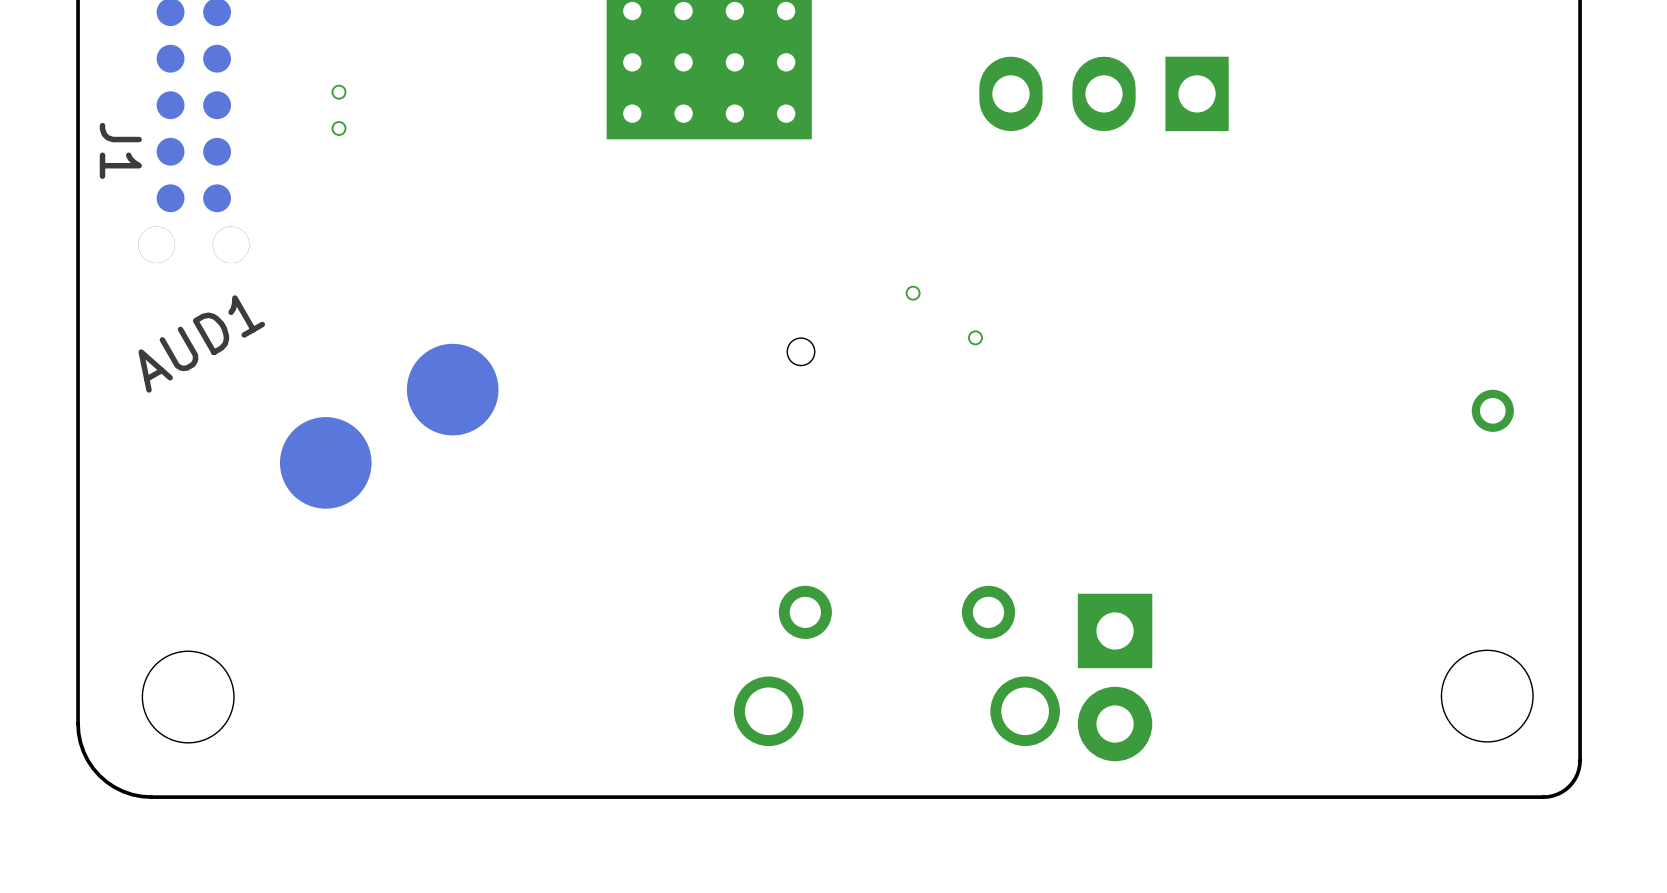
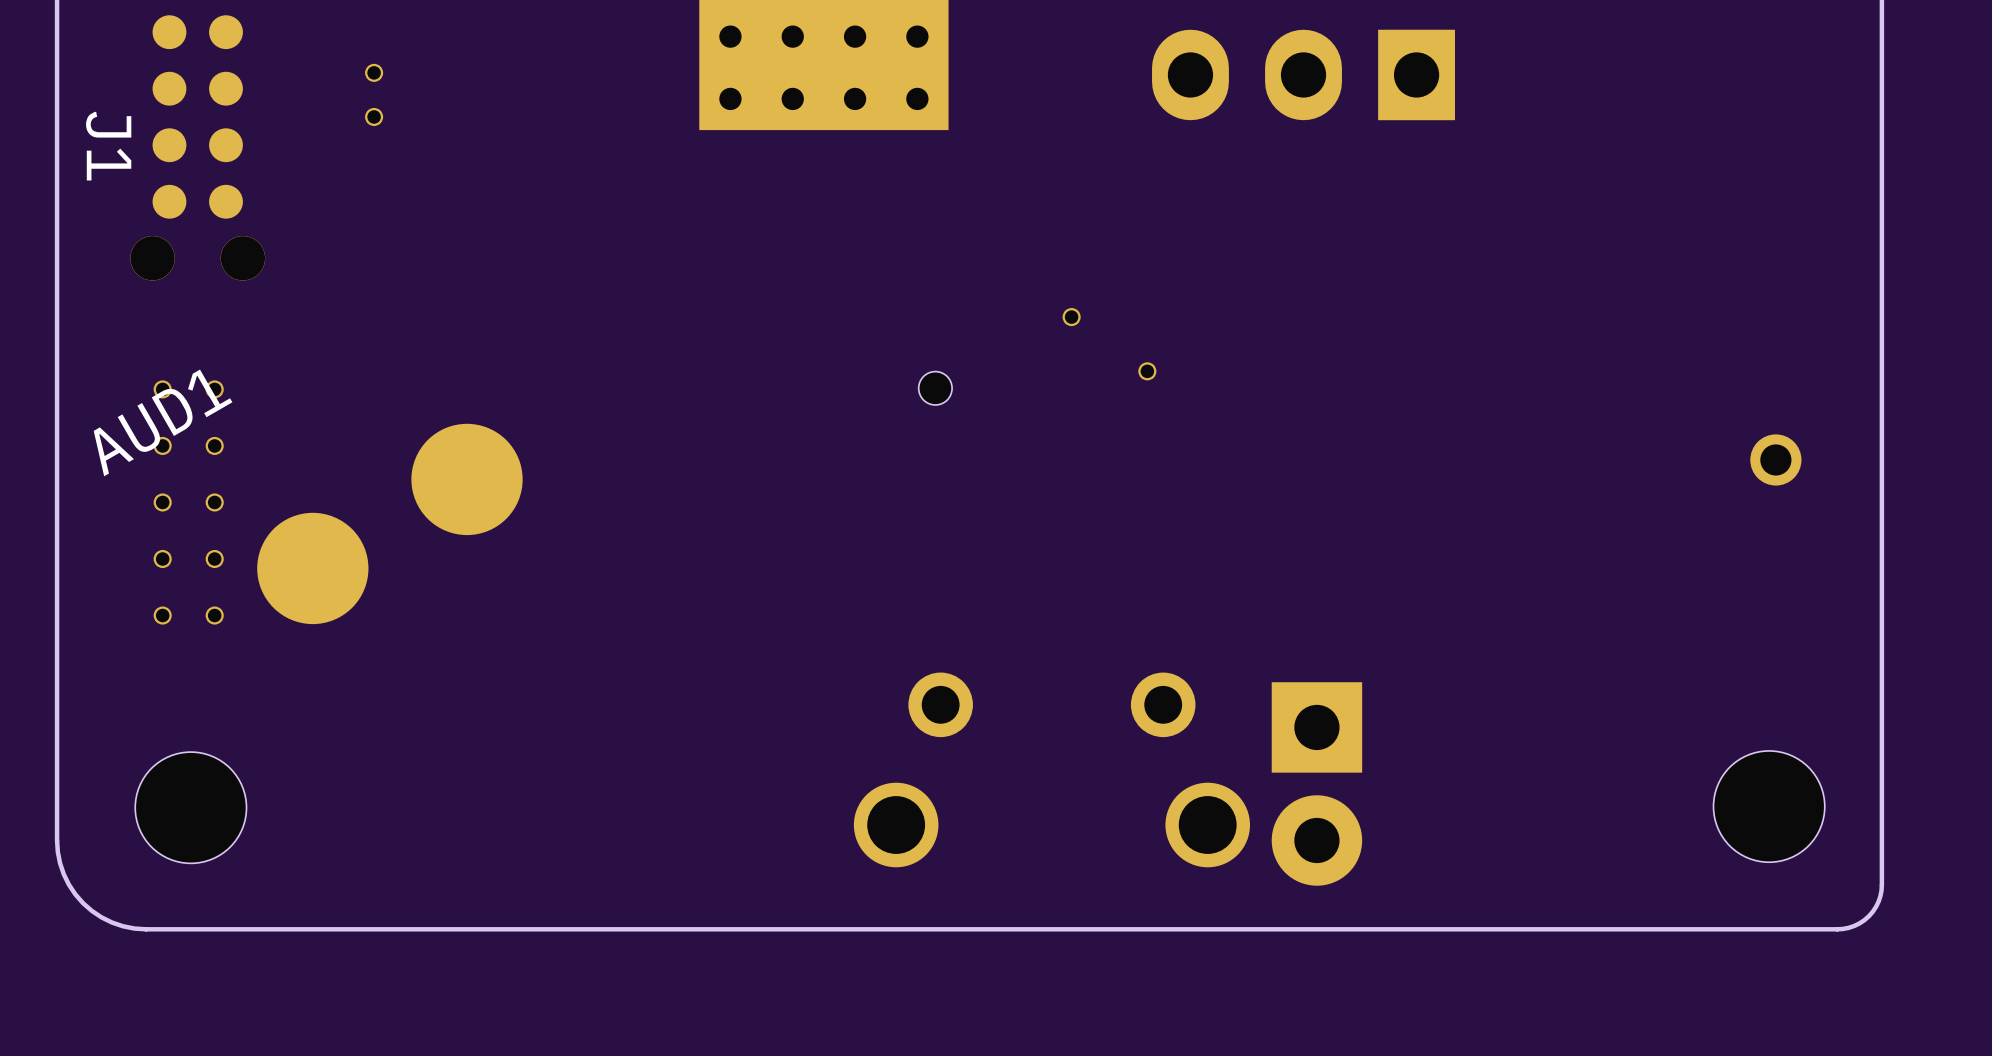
part: none -> (162, 389)
part: none -> (214, 389)
part: none -> (162, 445)
part: none -> (214, 445)
AUD1 position: (389, 426) -> (389, 523)
part: none -> (162, 502)
part: none -> (214, 502)
part: none -> (162, 559)
part: none -> (214, 559)
part: none -> (162, 615)
part: none -> (214, 615)

